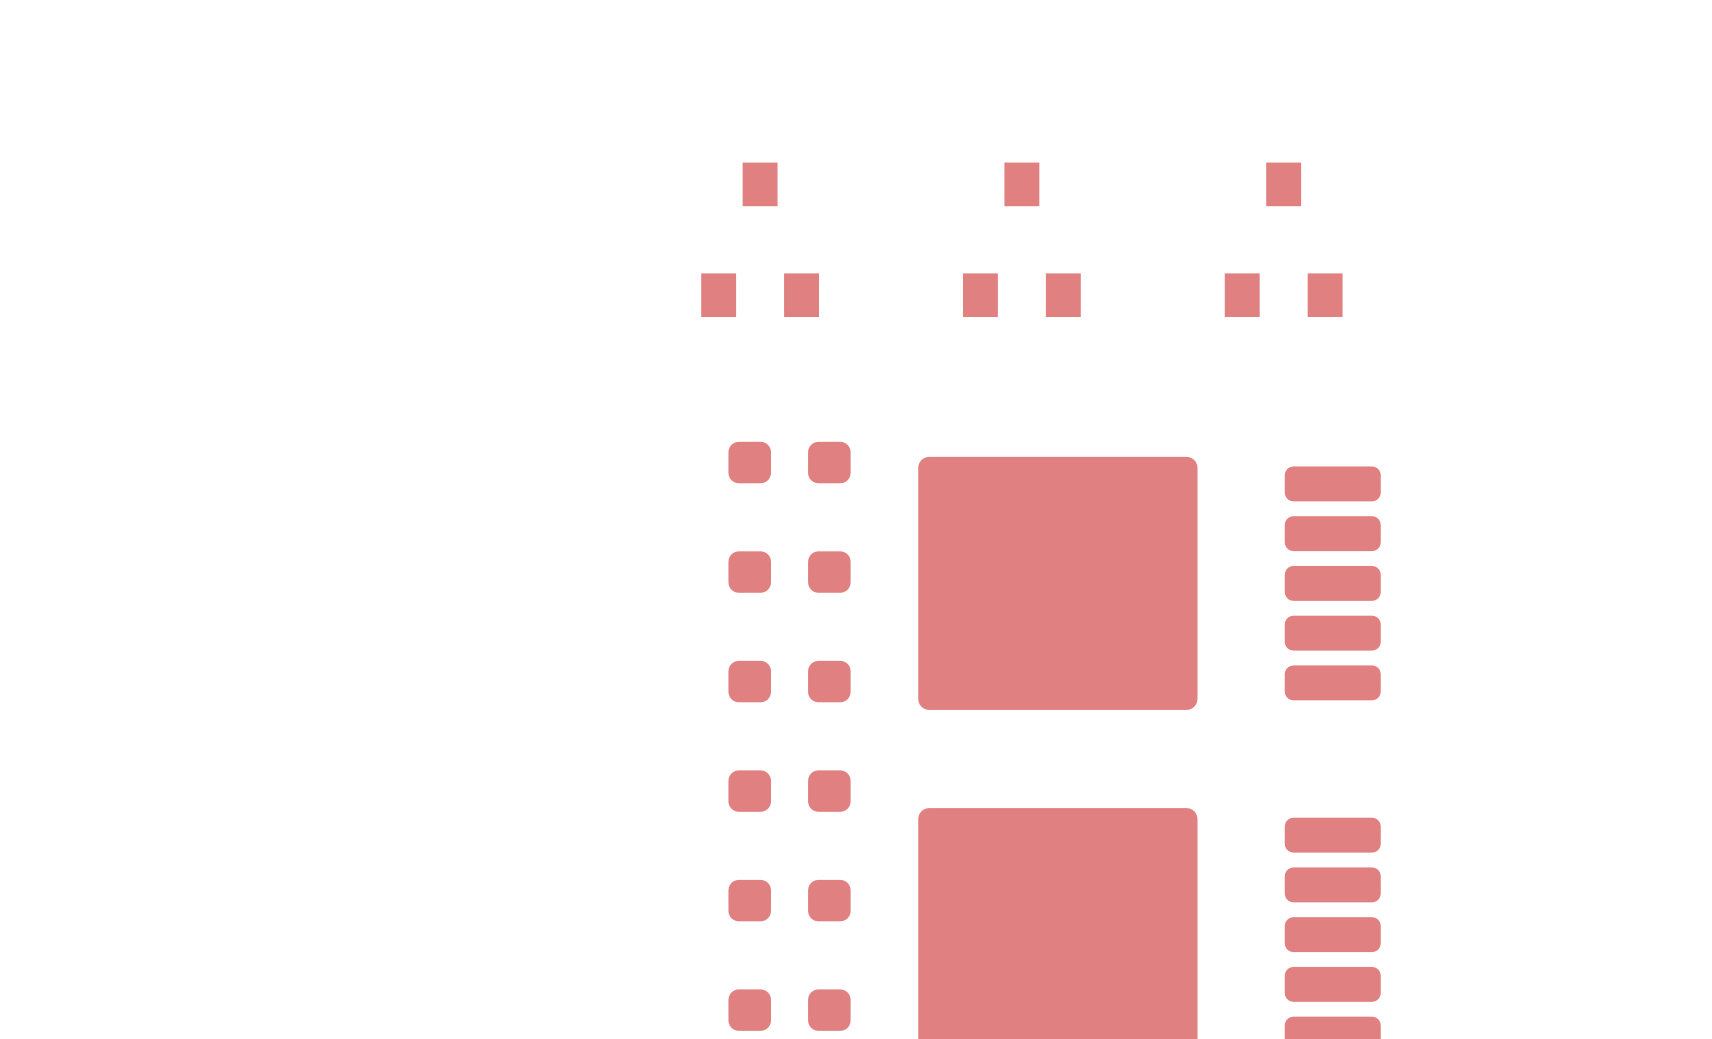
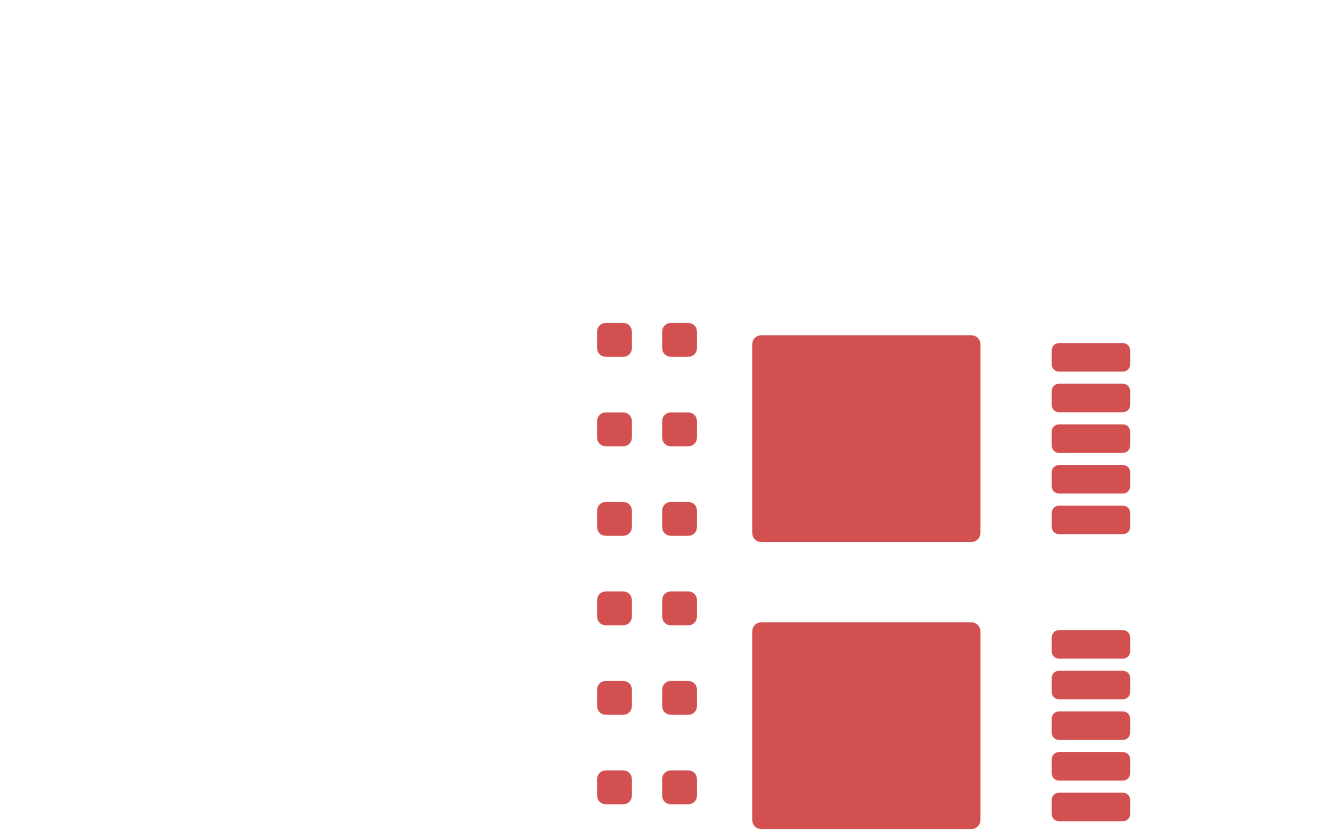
part: (760, 239) -> none
part: (1021, 239) -> none
part: (1283, 239) -> none

